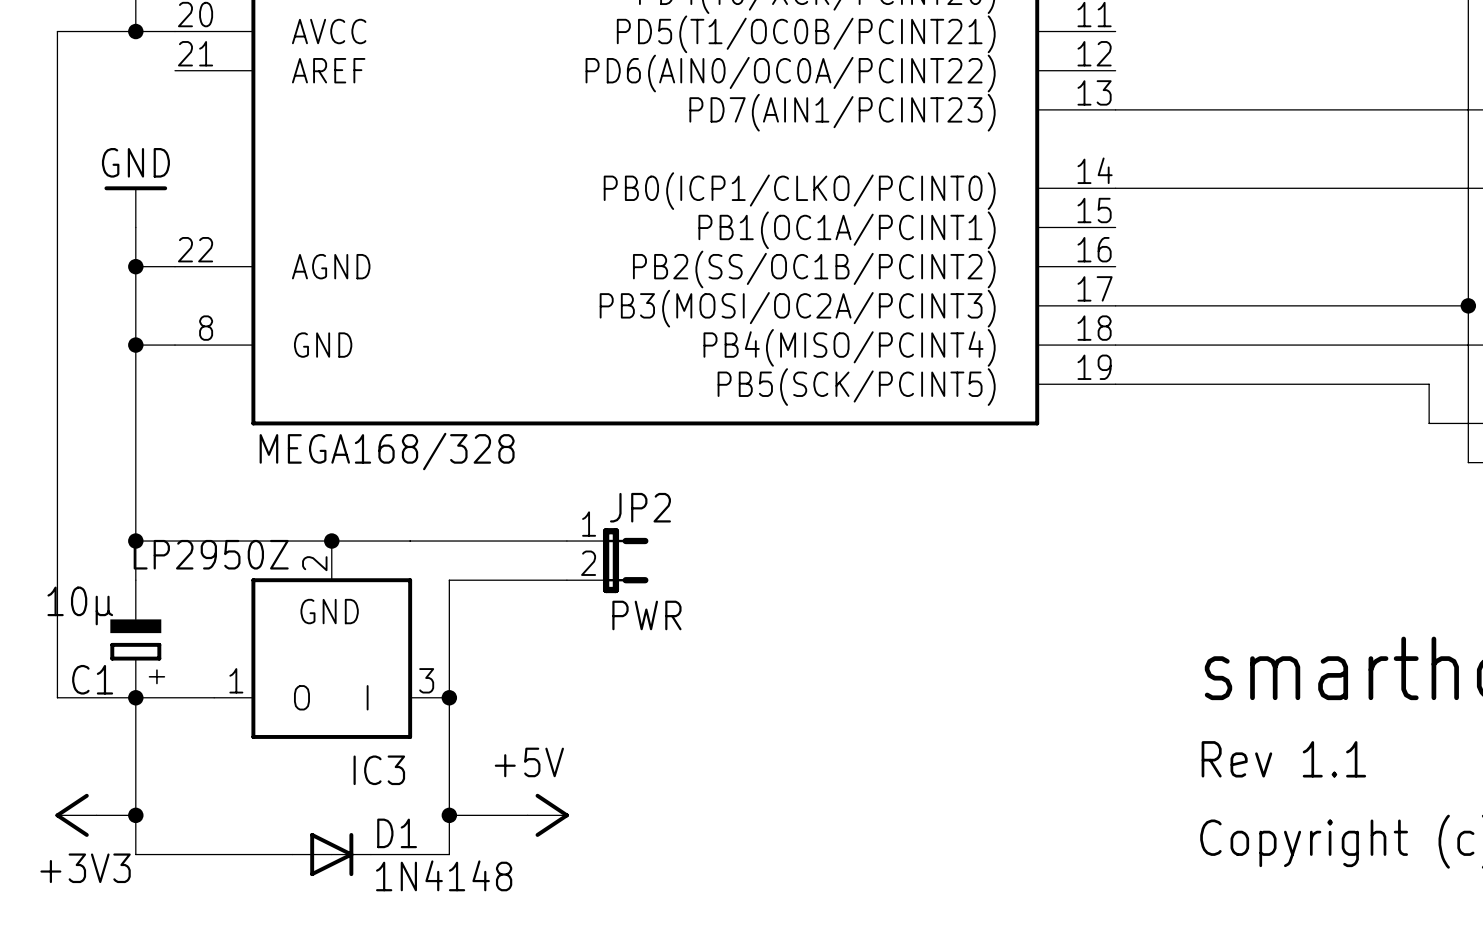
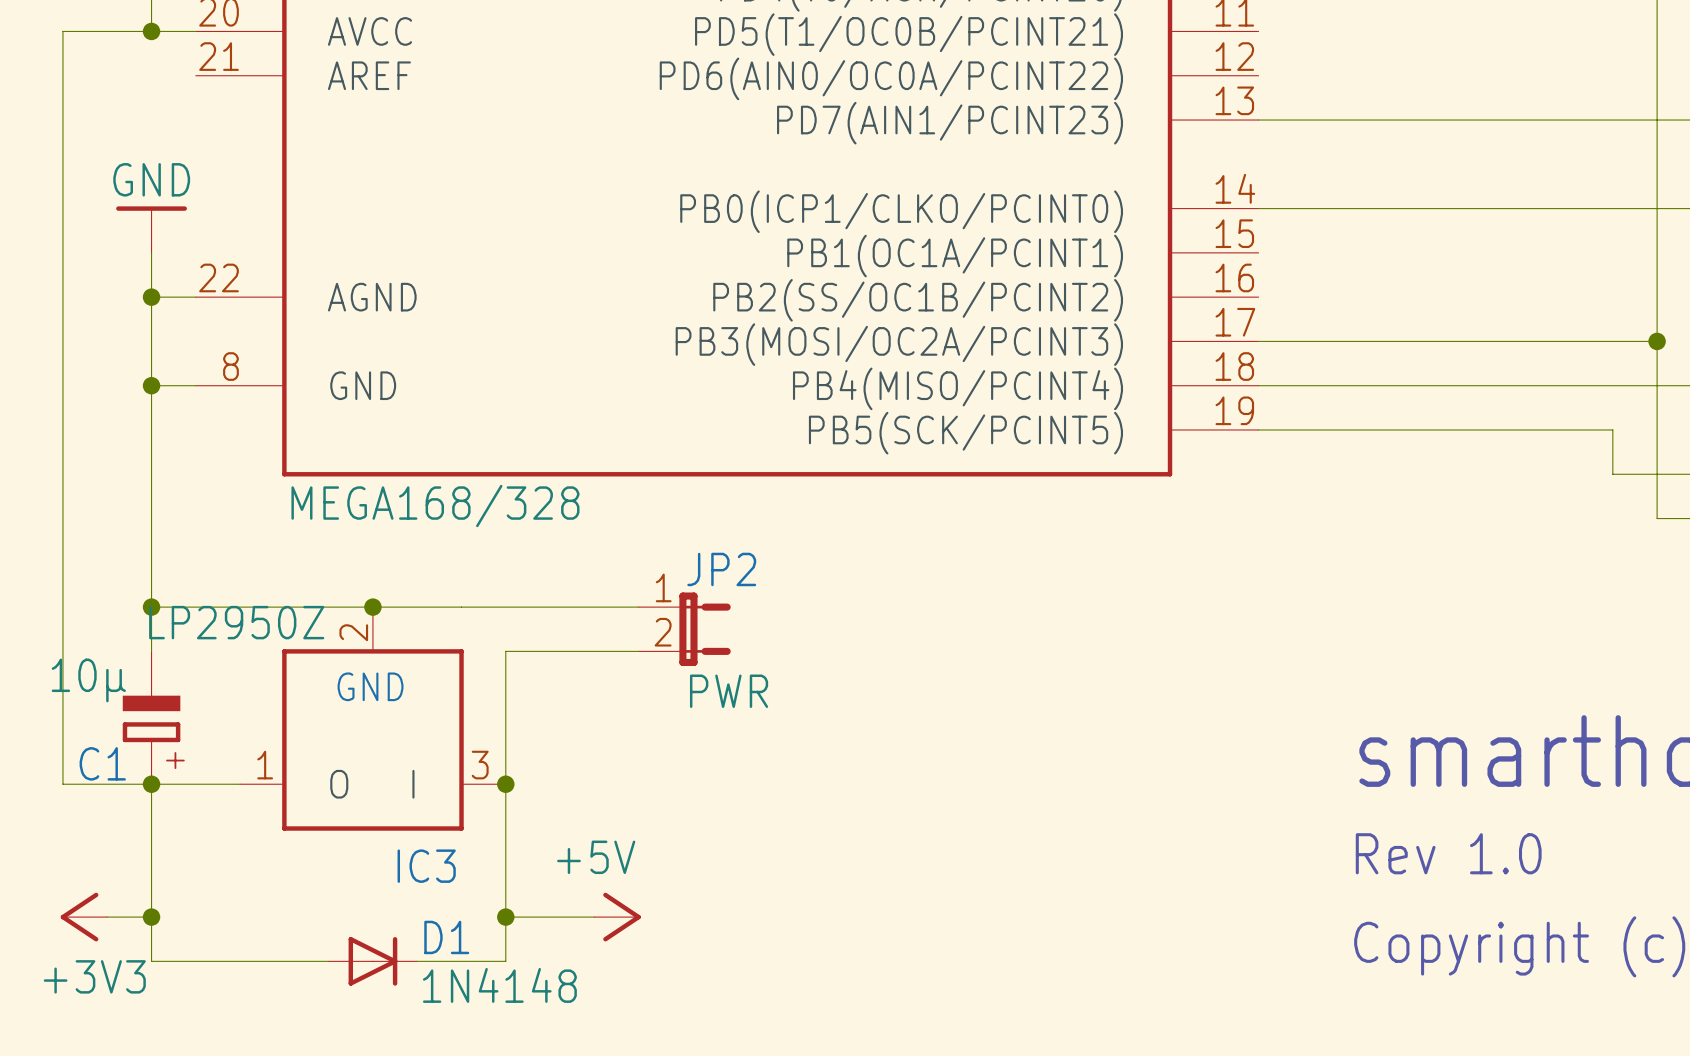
text: Rev 1.1 (1283, 759) -> Rev 1.0 (1448, 853)

